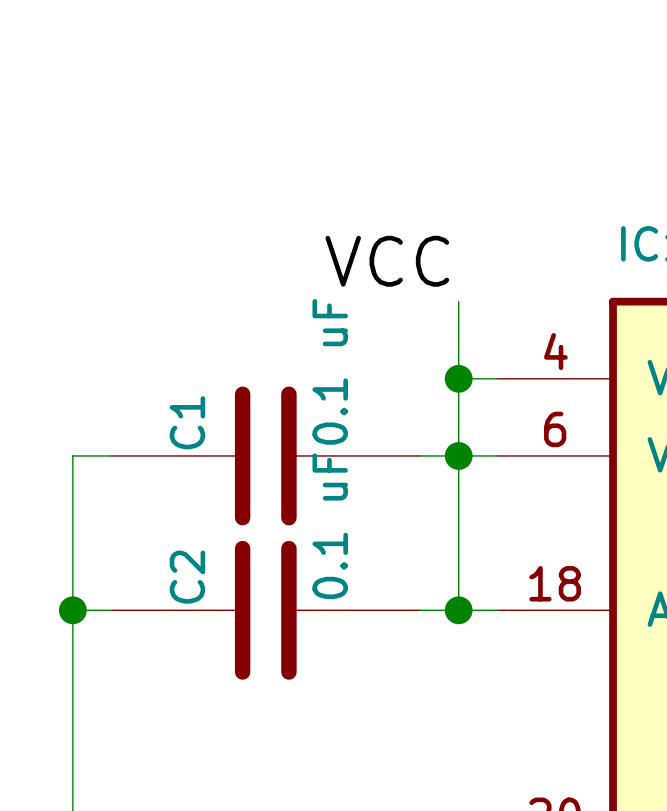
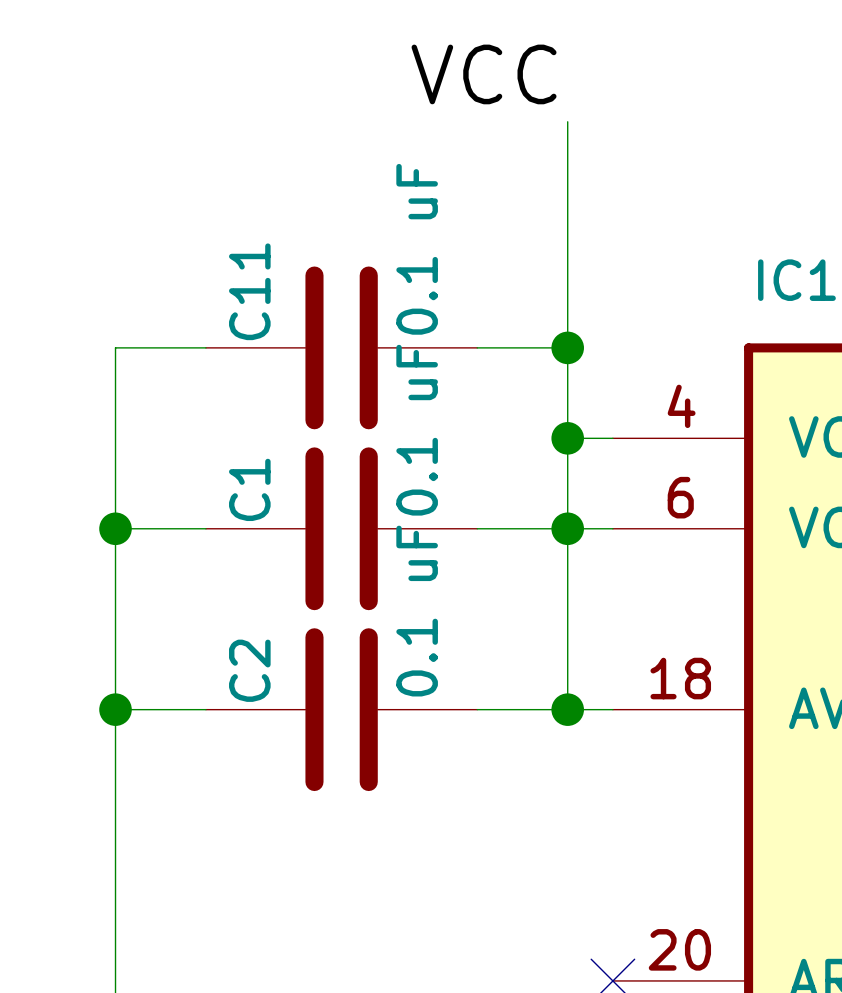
wire: none -> (567, 121) (567, 347) (477, 347)
label position: VCC (387, 261) -> VCC (484, 74)
wire: none -> (205, 347) (115, 347) (115, 528)
C11: none -> 0.1 uF (341, 347)
junction: none -> (567, 347)
C1 symbol: [111, 386, 421, 526] -> [205, 447, 478, 611]
junction: none -> (115, 528)
C2 symbol: [111, 540, 421, 680] -> [205, 628, 478, 792]

